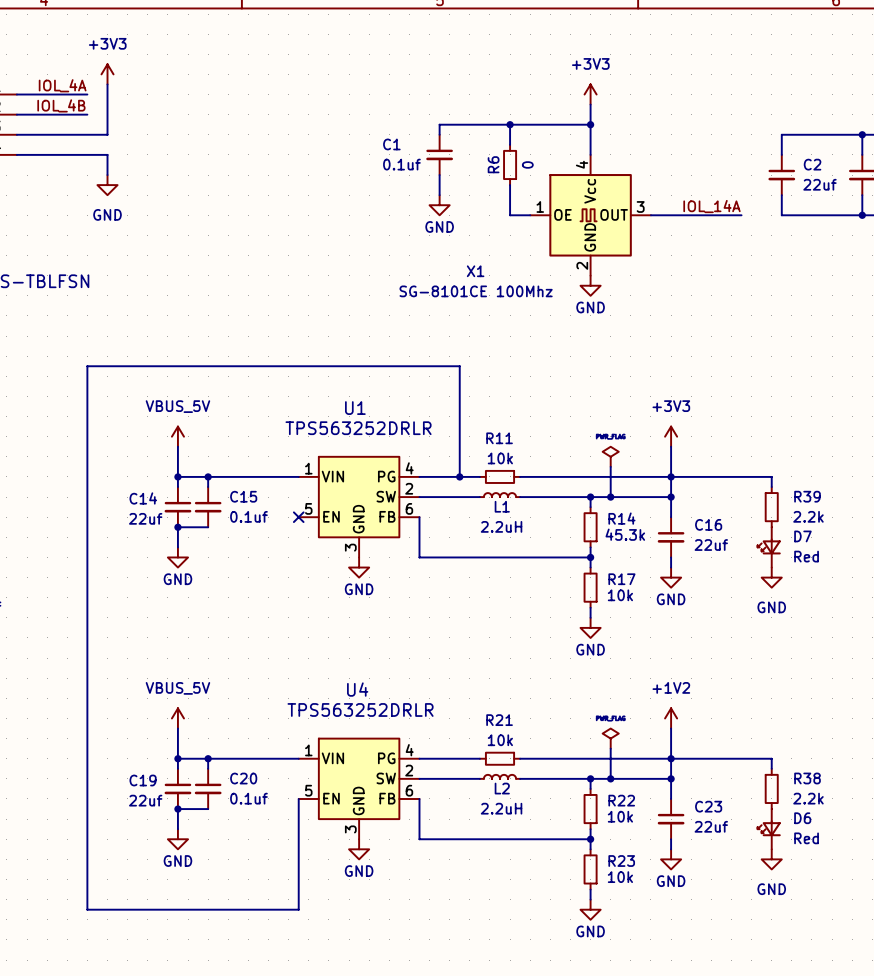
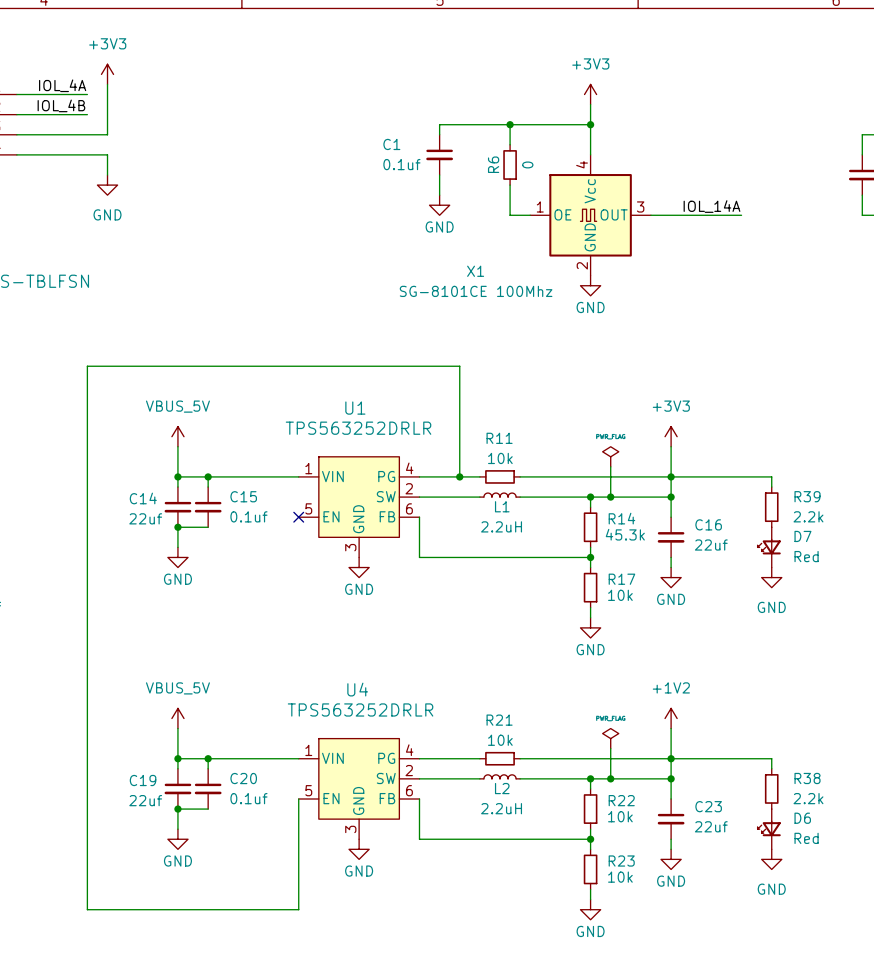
wire: (862, 134) (781, 134) (781, 154) -> none
junction: (862, 134) -> none
C2: 22uf (781, 175) -> none
wire: (781, 195) (781, 215) (862, 215) -> none
junction: (862, 215) -> none

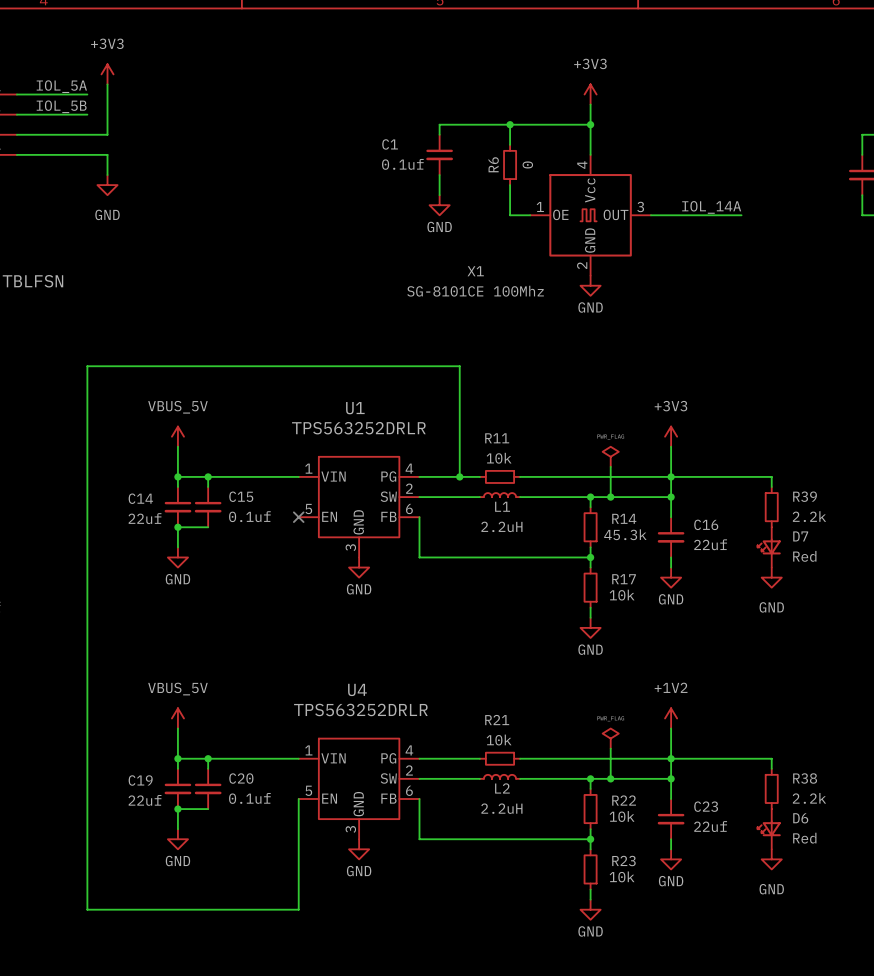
label: IOL_4A (62, 85) -> IOL_5A (61, 86)
label: IOL_4B (61, 105) -> IOL_5B (61, 106)

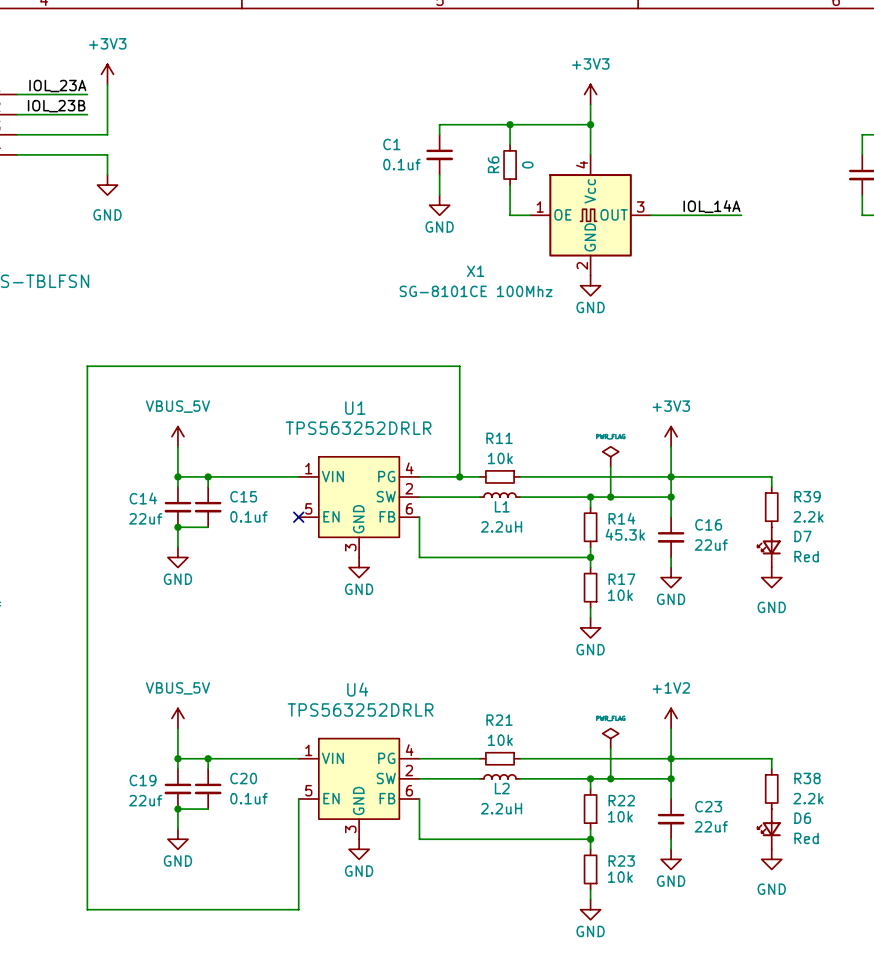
label: IOL_5A (61, 86) -> IOL_23A (57, 86)
label: IOL_5B (61, 106) -> IOL_23B (56, 106)

